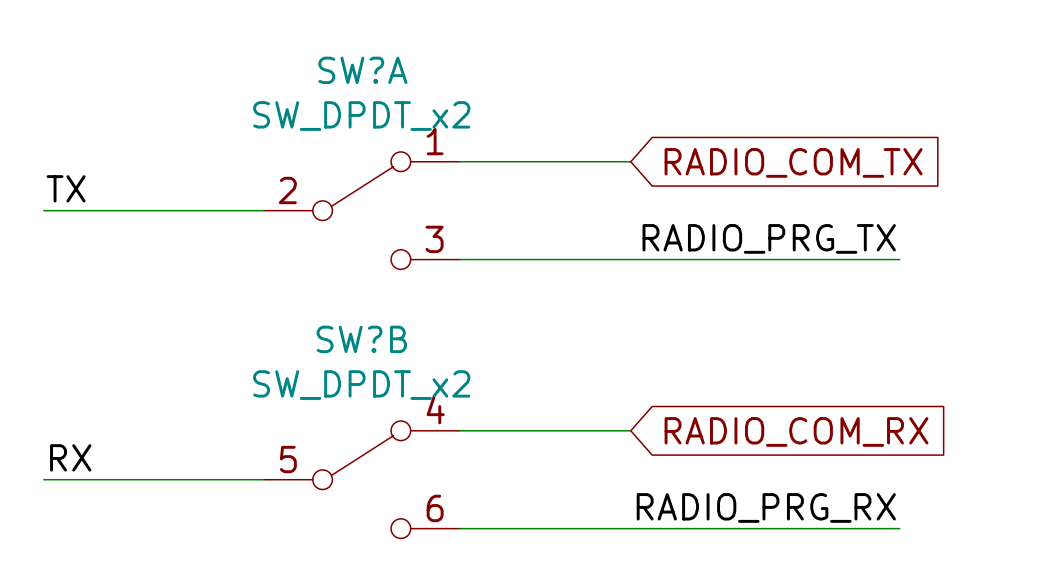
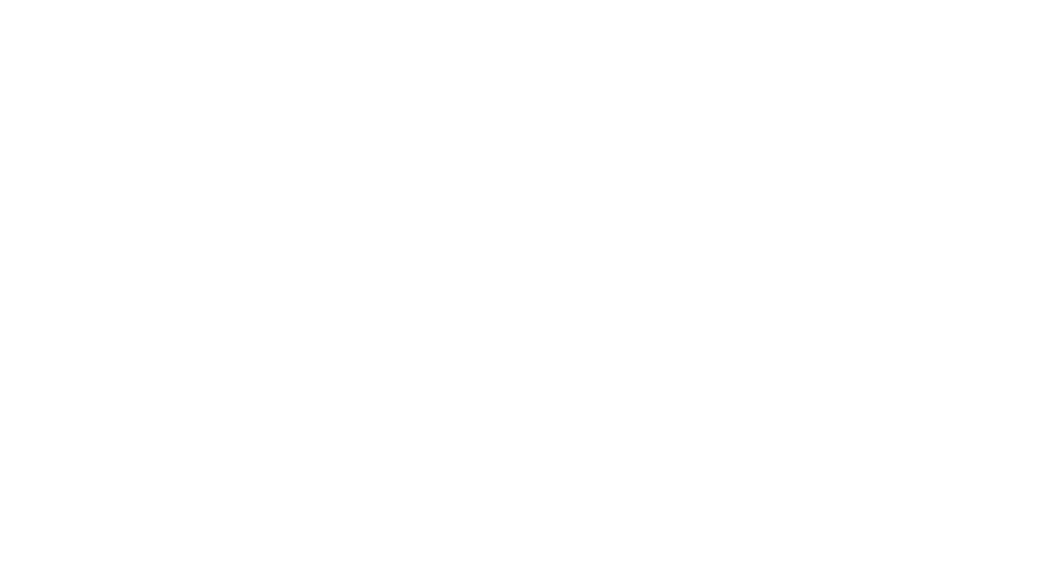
wire: (459, 161) (630, 161) -> none
global label: RADIO_COM_TX (793, 162) -> none
label: TX (66, 188) -> none
wire: (43, 210) (263, 210) -> none
SW?A: SW_DPDT_x2 (361, 210) -> none
label: RADIO_PRG_TX (769, 238) -> none
wire: (459, 259) (899, 259) -> none
wire: (459, 430) (630, 430) -> none
global label: RADIO_COM_RX (796, 431) -> none
label: RX (70, 457) -> none
wire: (43, 479) (263, 479) -> none
SW?B: SW_DPDT_x2 (361, 479) -> none
label: RADIO_PRG_RX (766, 507) -> none
wire: (459, 528) (899, 528) -> none

